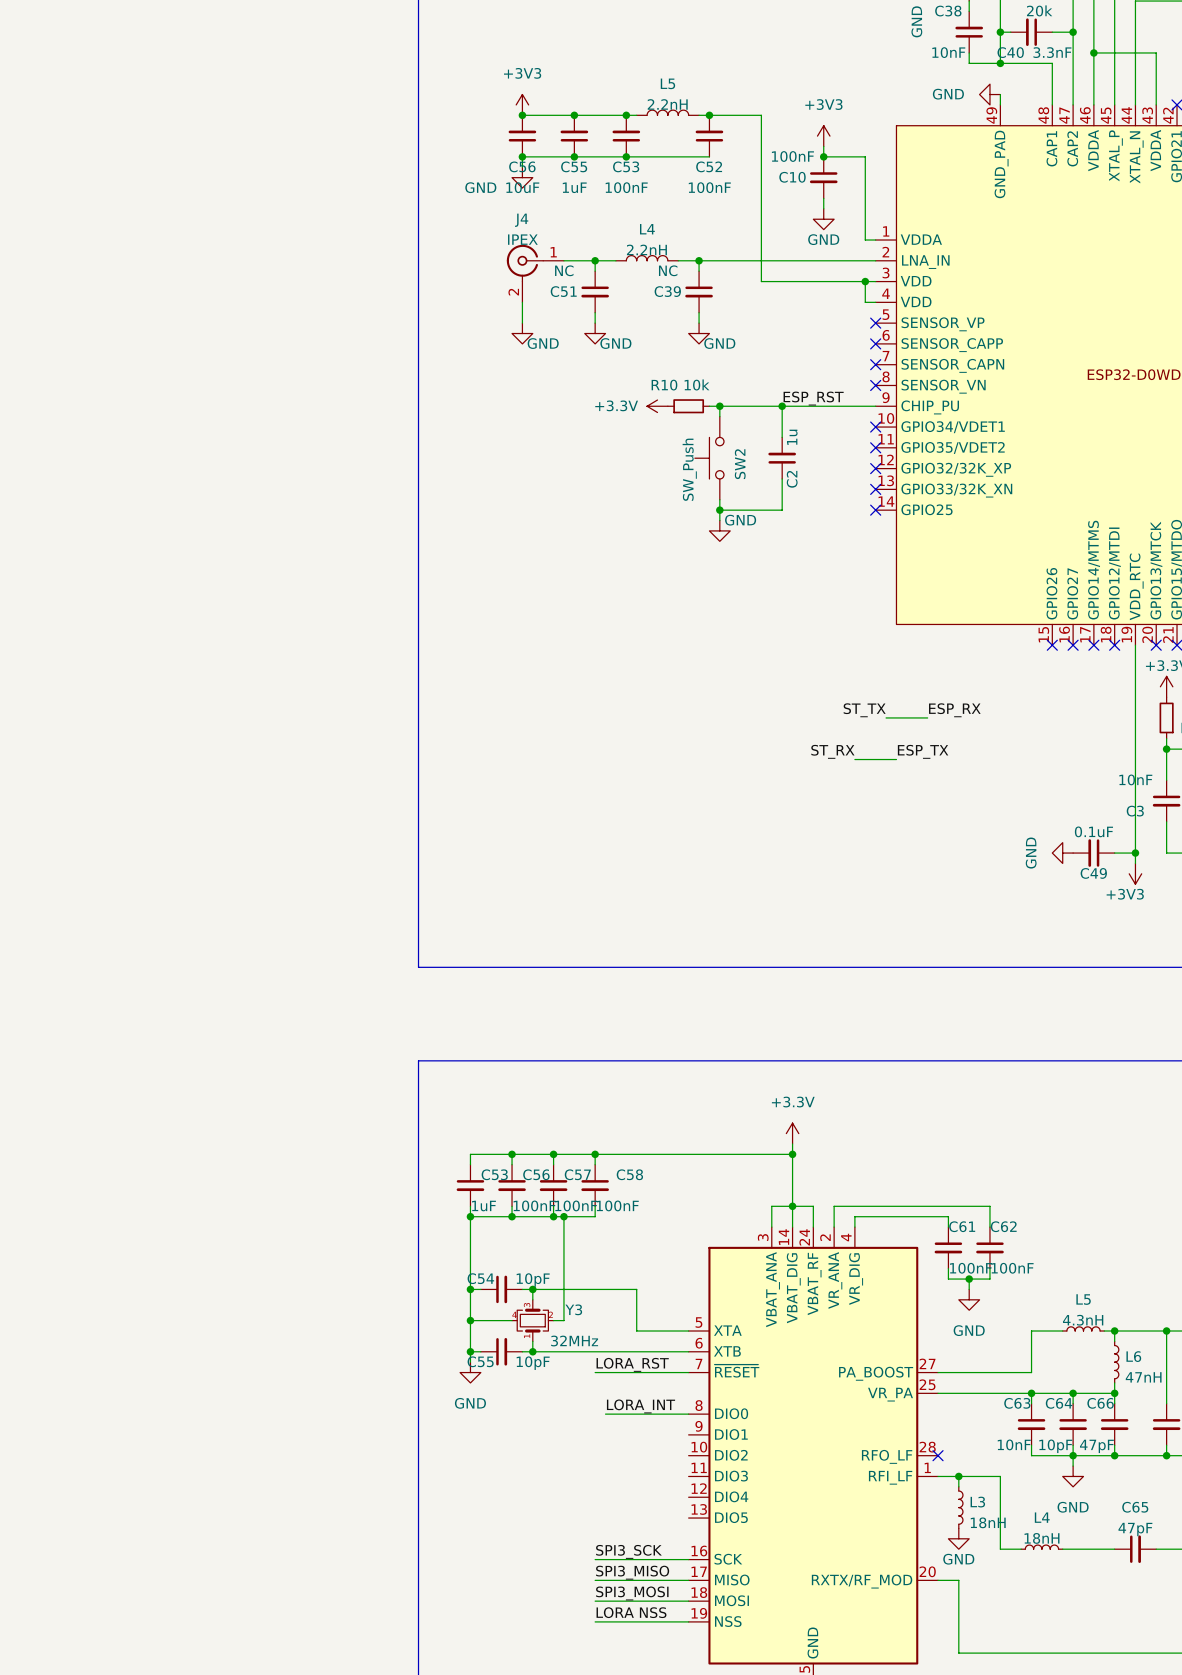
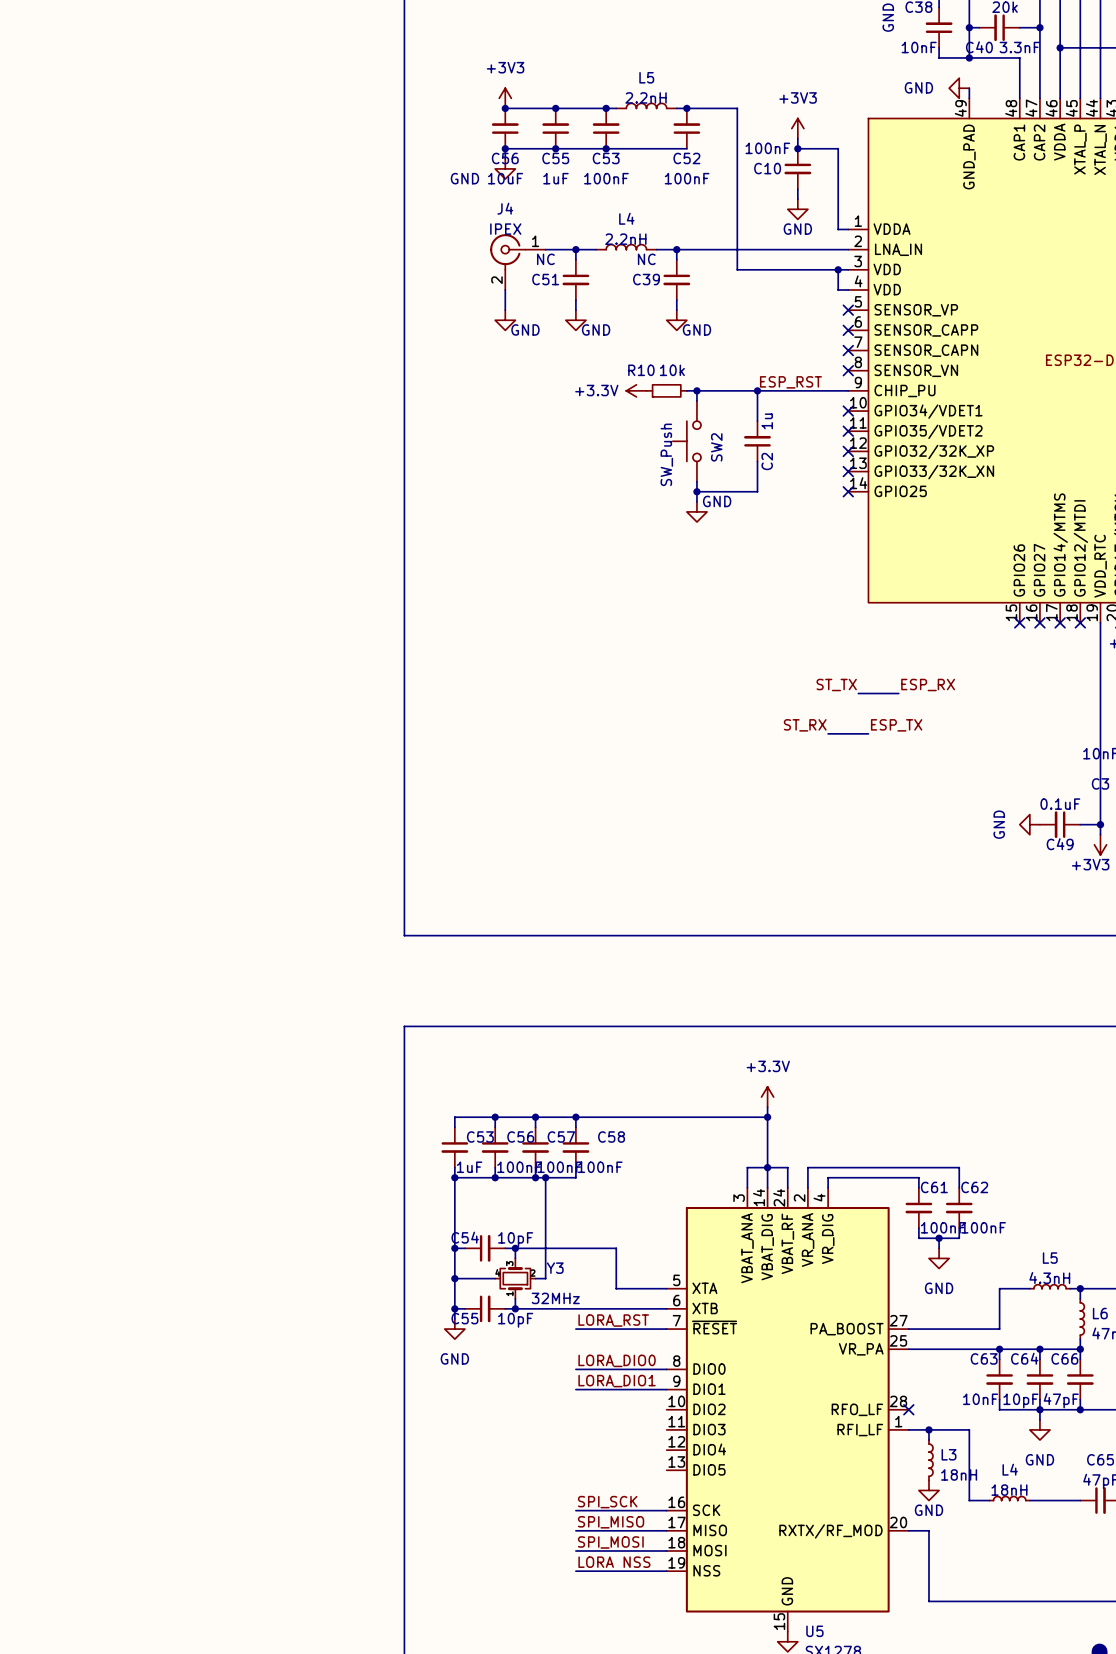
label: LORA_INT (641, 1406) -> LORA_DIO0 (617, 1360)
wire: none -> (575, 1369) (586, 1369)
label: none -> LORA_DIO1 (617, 1381)
wire: none -> (575, 1389) (666, 1389)
label: SPI3_SCK (628, 1551) -> SPI_SCK (607, 1502)
label: SPI3_MISO (632, 1572) -> SPI_MISO (611, 1522)
label: SPI3_MOSI (632, 1593) -> SPI_MOSI (610, 1542)

